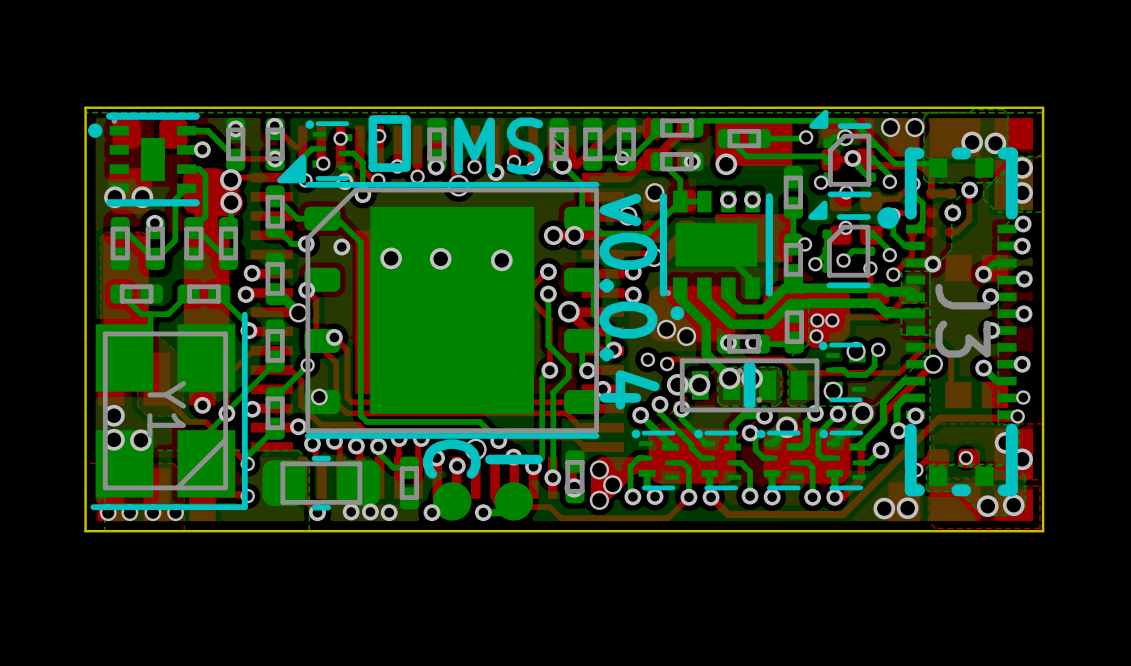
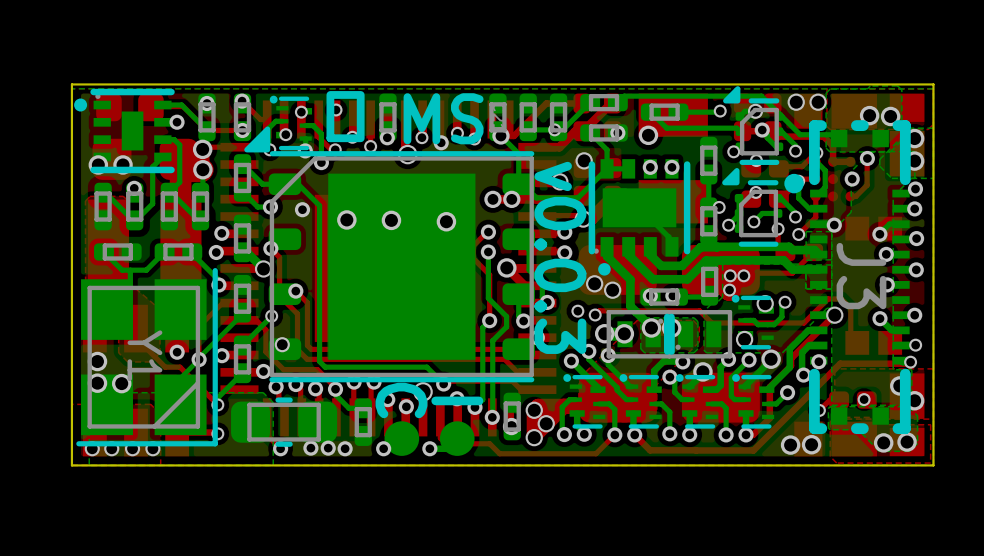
text: v0.0.4 (629, 301) -> v0.0.3 (560, 257)

